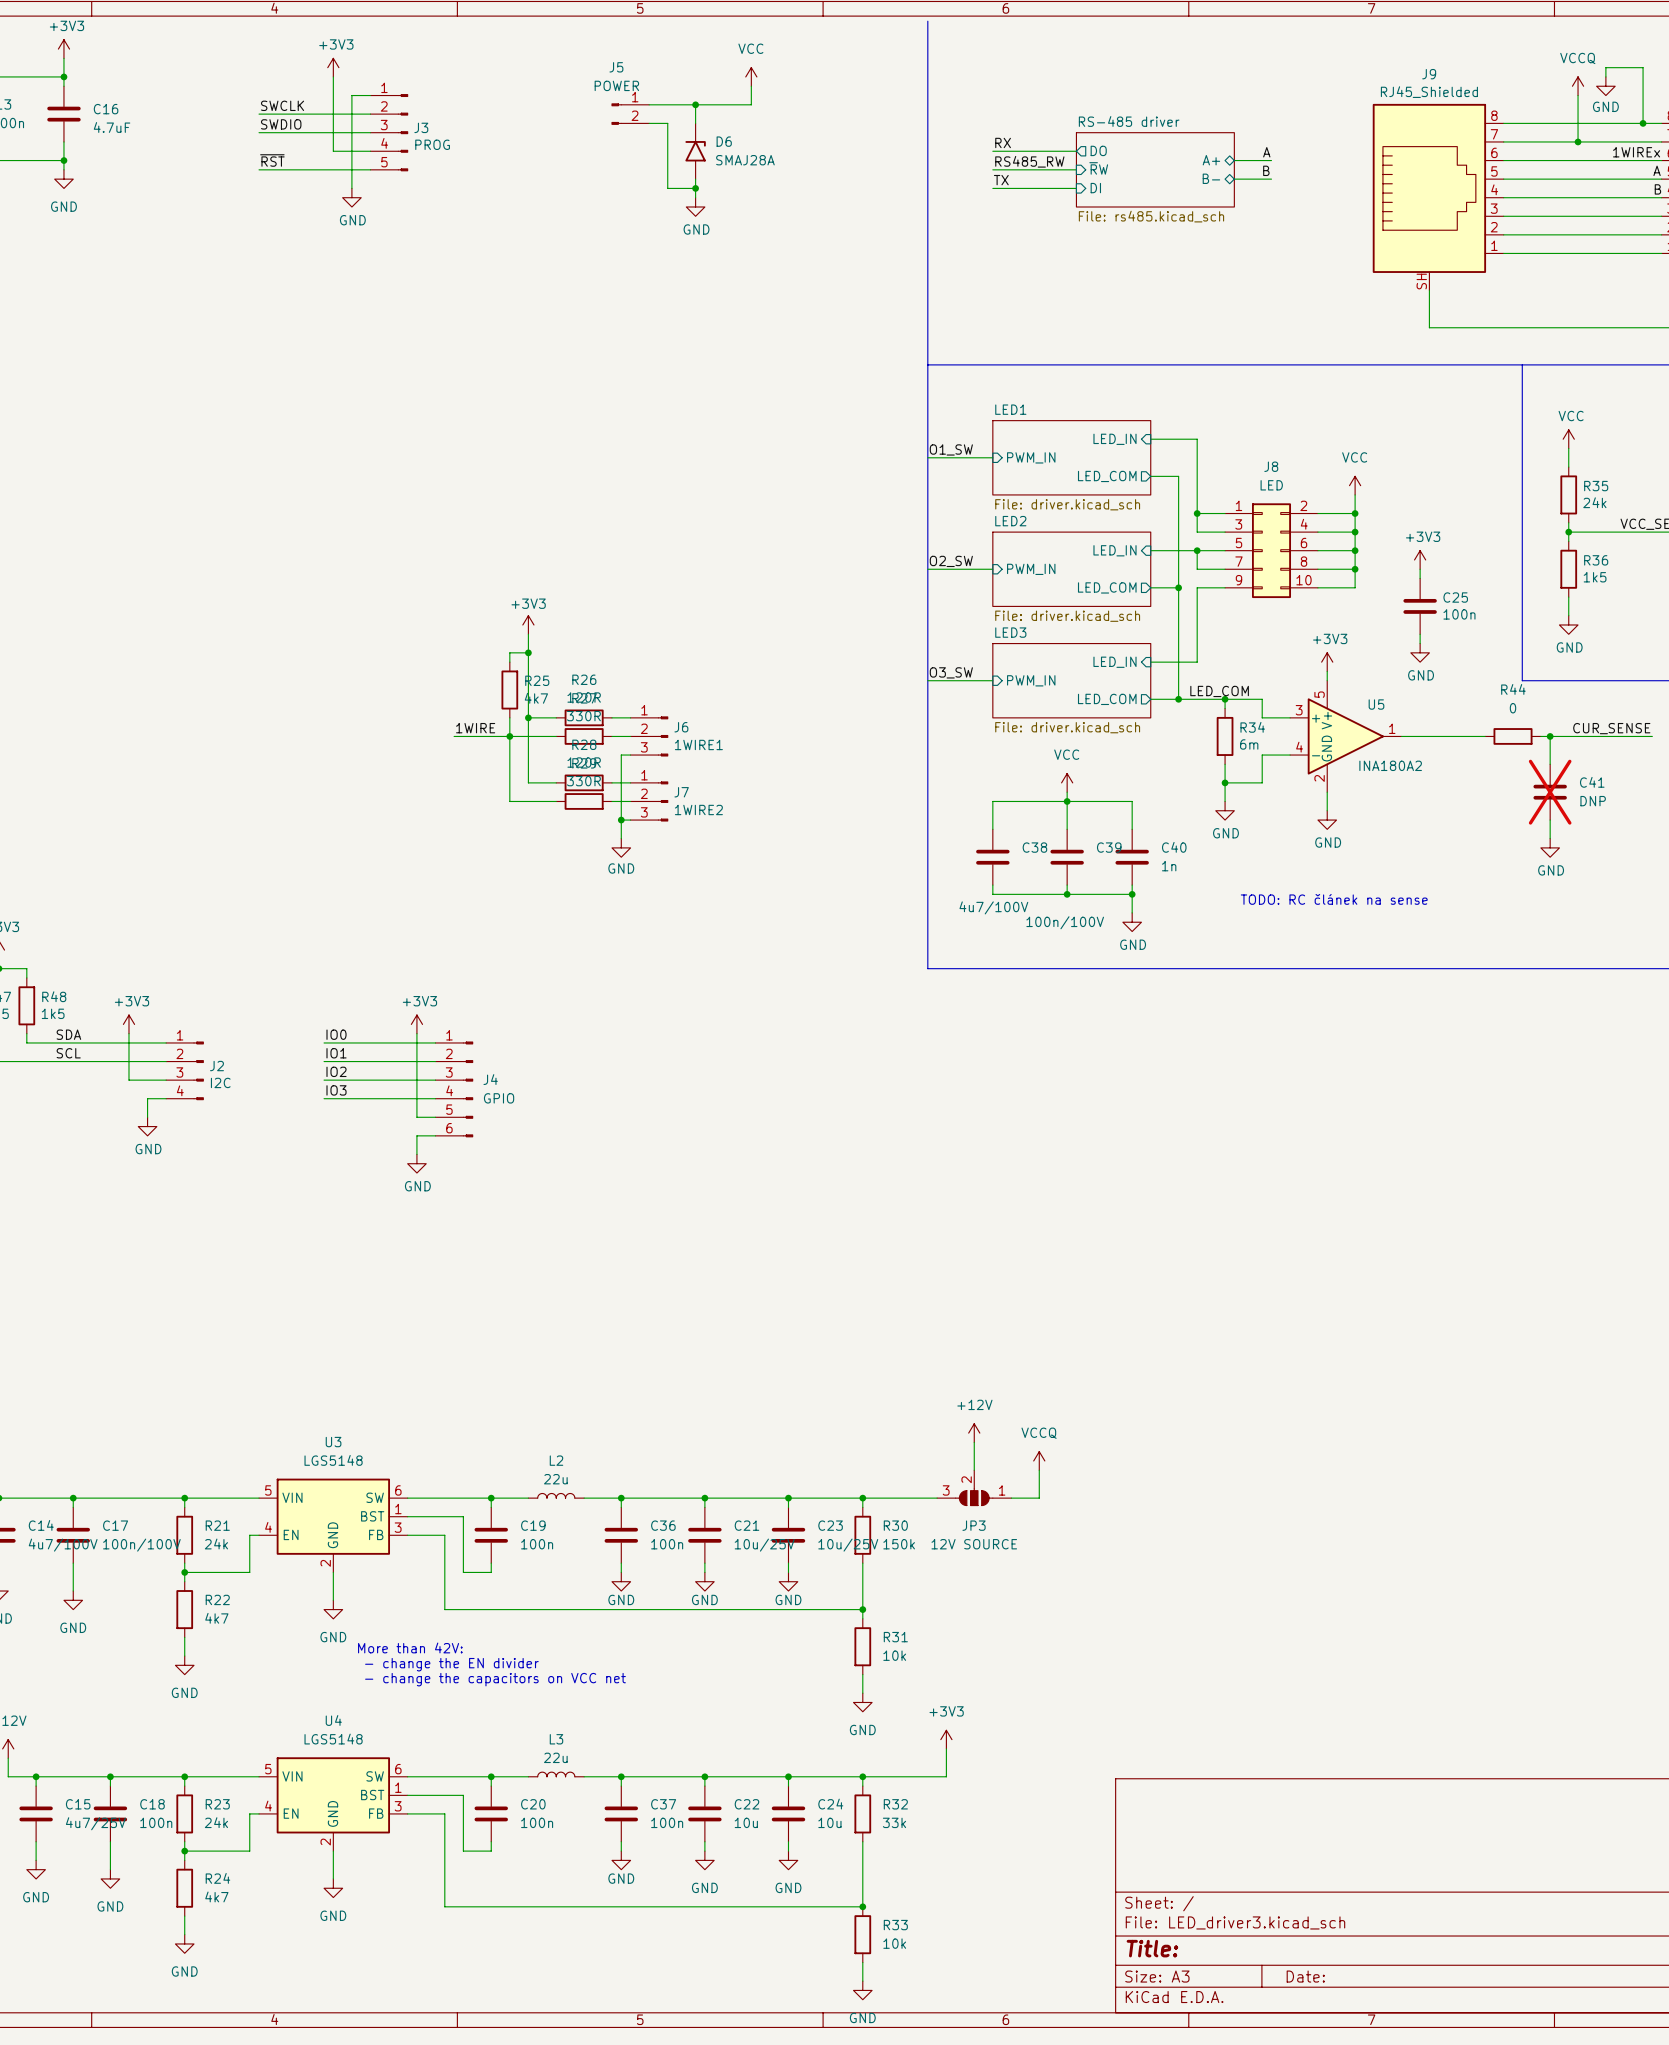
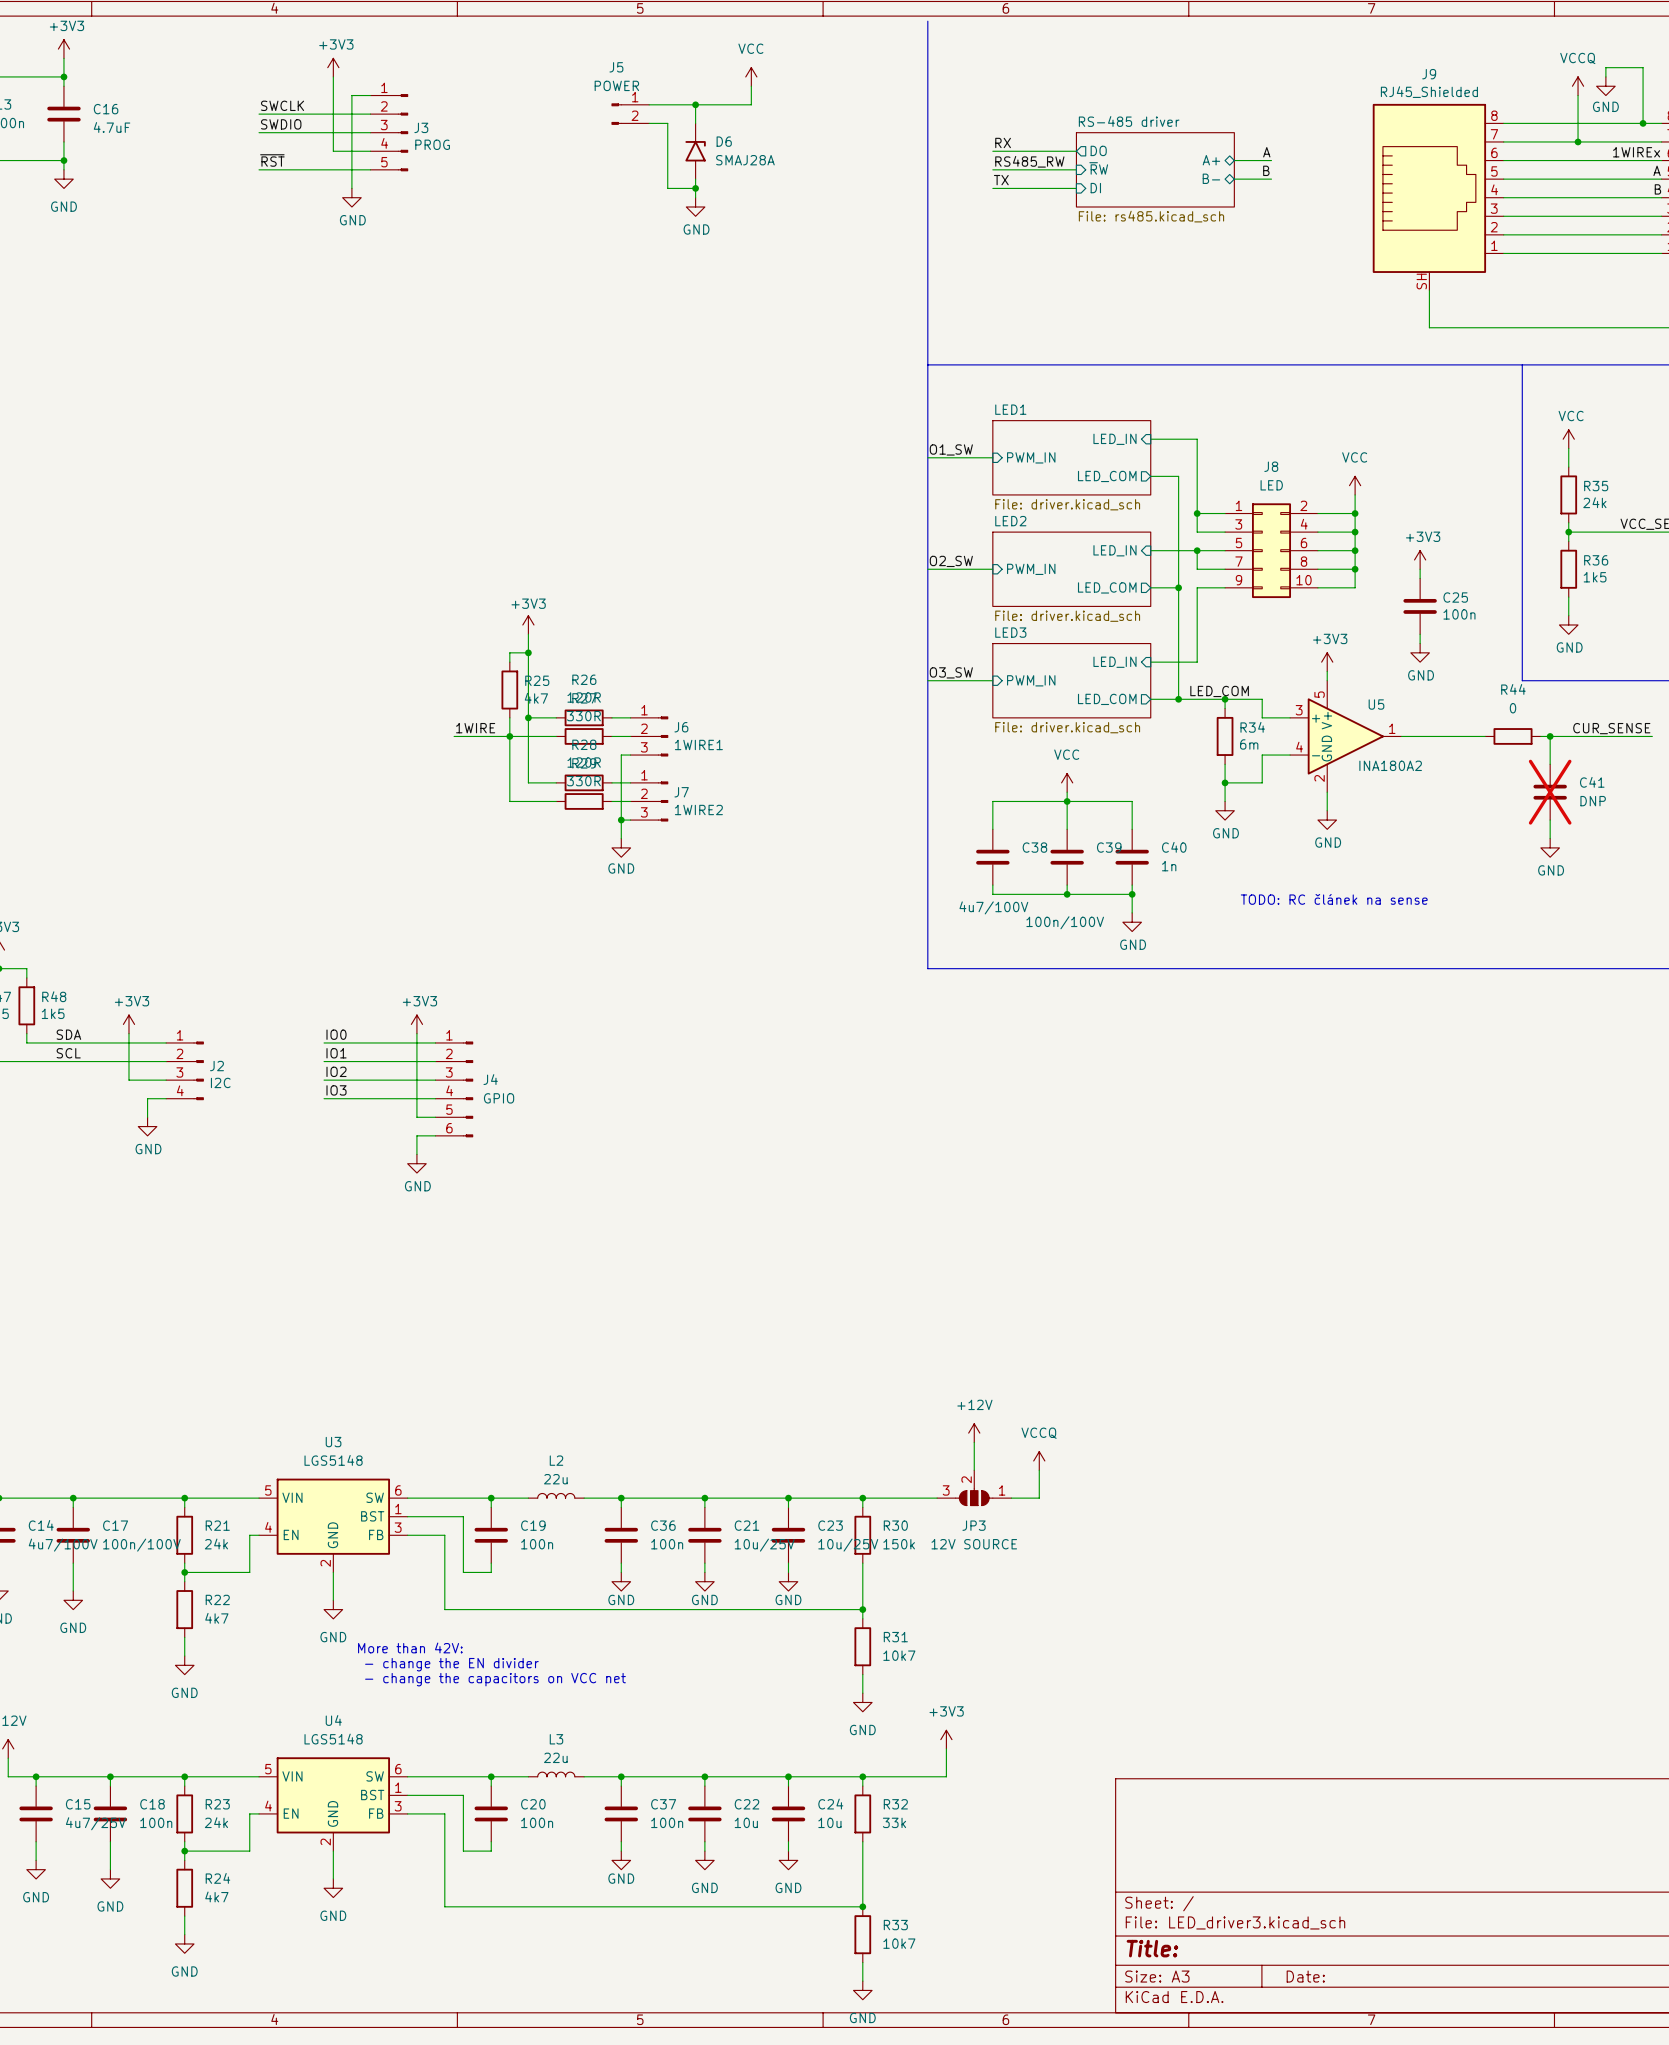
R31 value: 10k (894, 1655) -> 10k7 (899, 1655)
R33 value: 10k (894, 1943) -> 10k7 (899, 1943)

